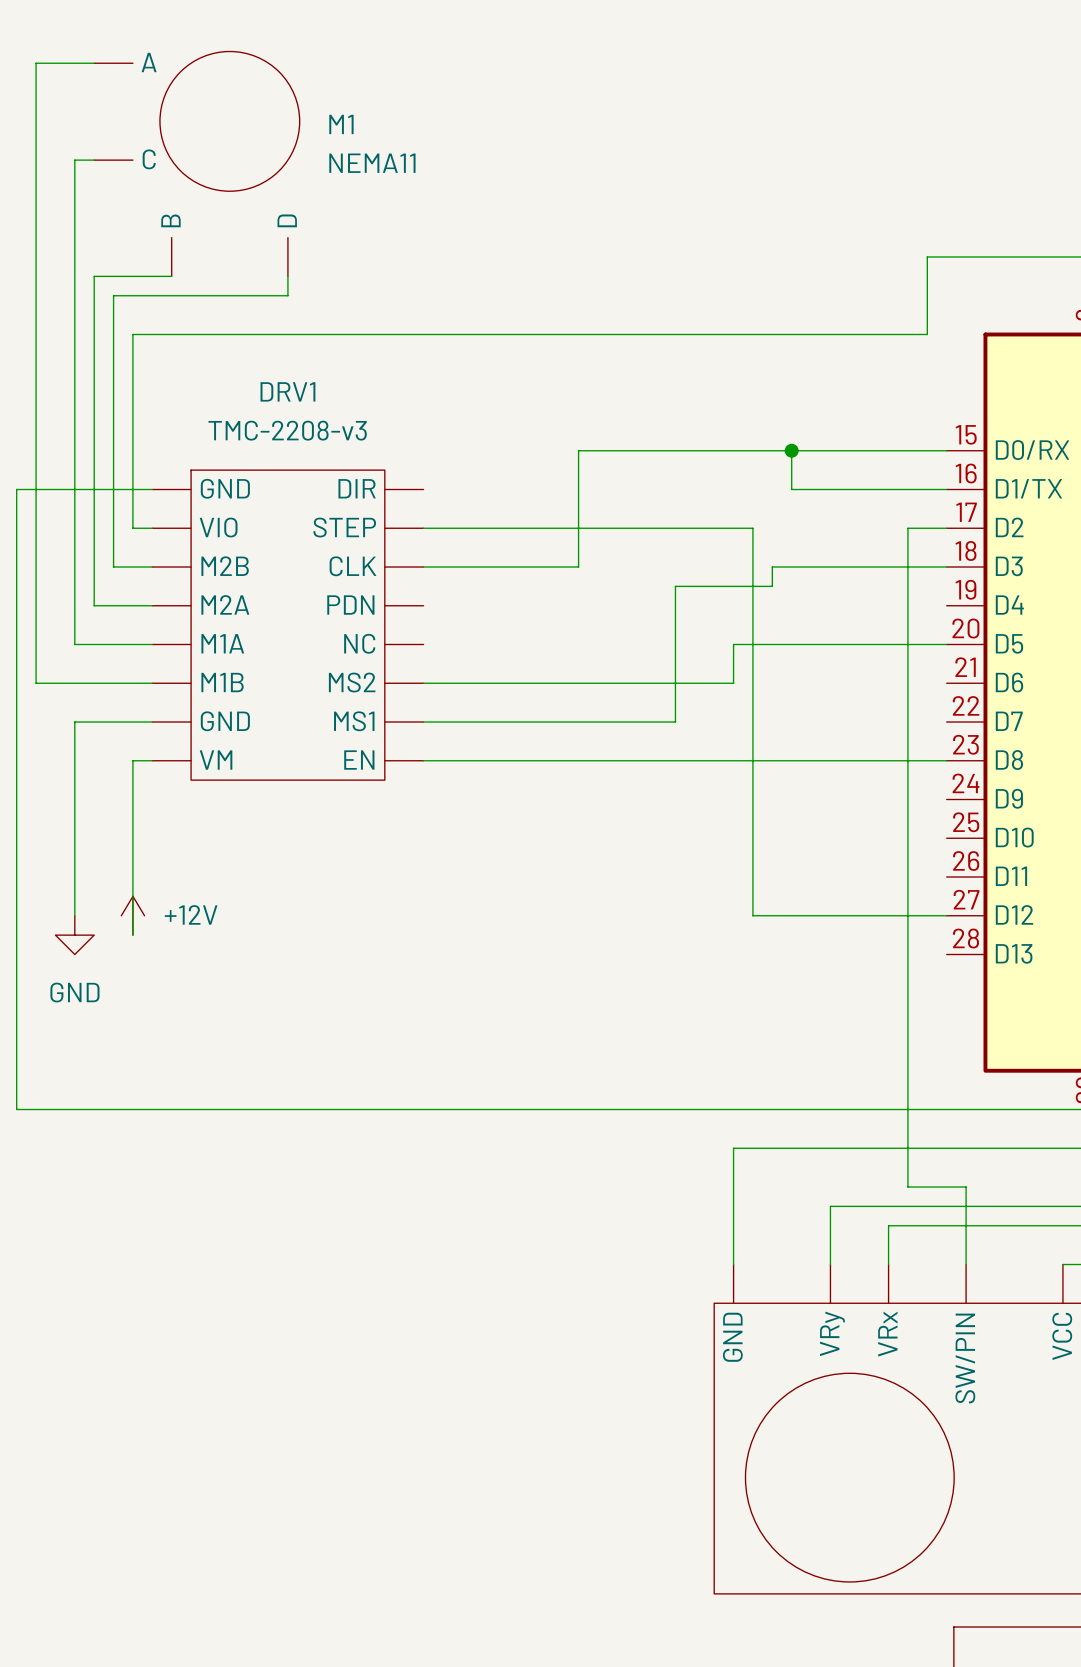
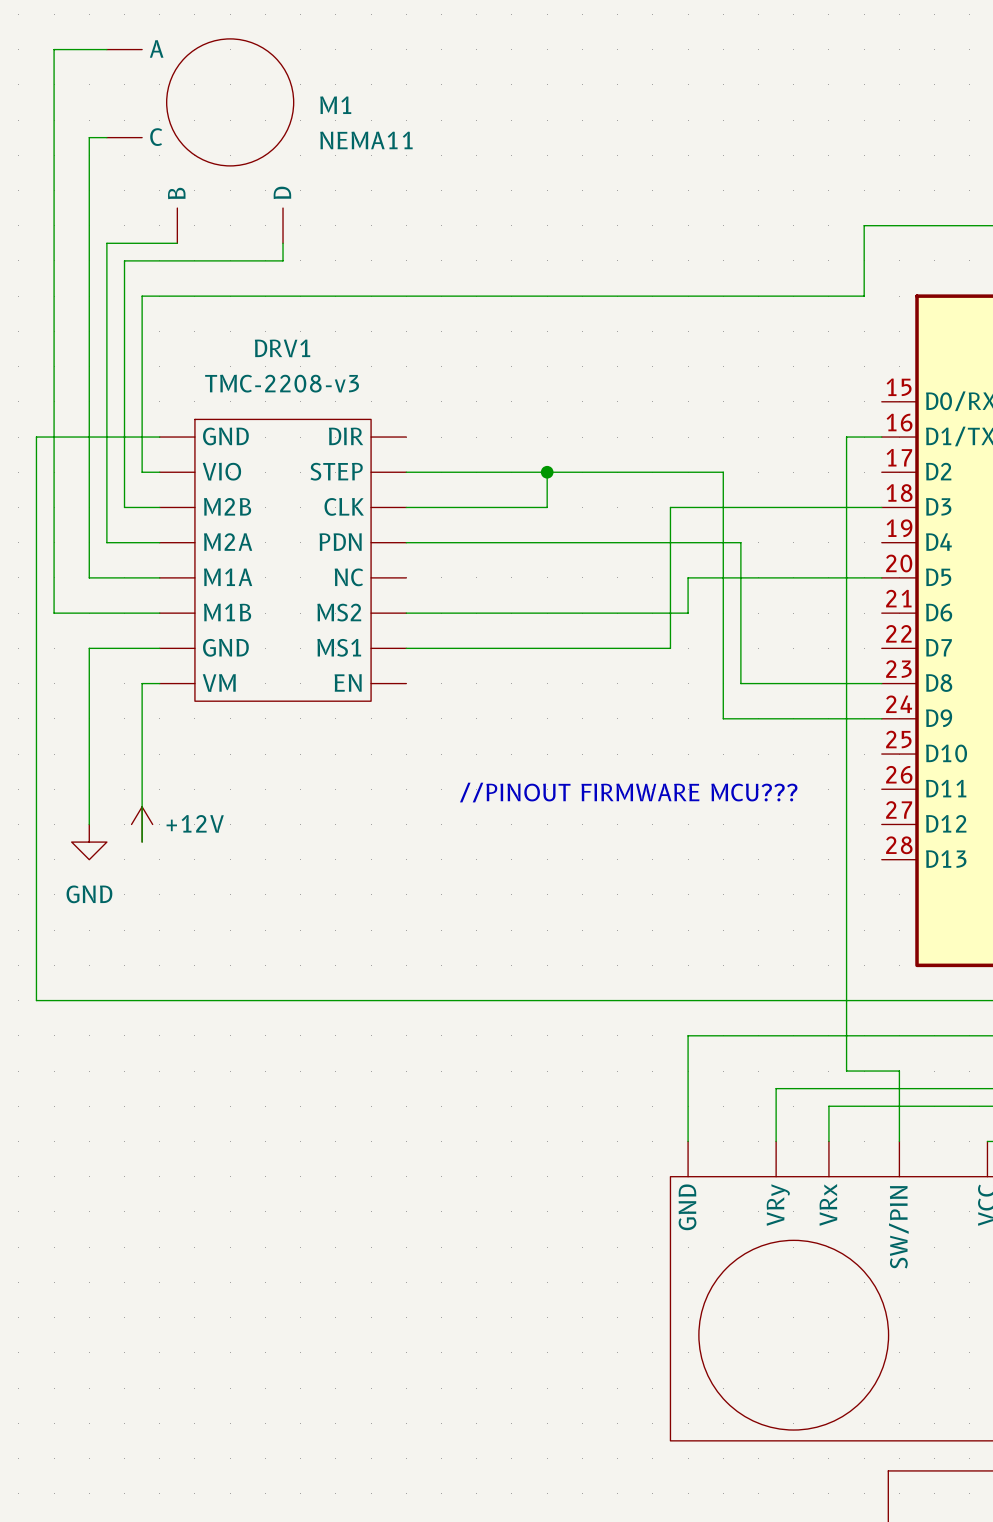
wire: (791, 450) (791, 489) (907, 489) -> none
junction: (791, 450) -> none
wire: (946, 450) (578, 450) (578, 528) -> none
junction: none -> (547, 472)
wire: (752, 528) (752, 915) (946, 915) -> none
wire: (907, 528) (946, 528) -> (846, 472) (846, 437)
wire: (772, 586) (675, 586) (675, 722) -> (705, 472) (723, 472) (723, 507) (670, 507) (670, 648) (635, 648)
wire: none -> (723, 525) (723, 718) (881, 718)
wire: (423, 760) (791, 760) -> (406, 542) (740, 542) (740, 683)
text: none -> //PINOUT FIRMWARE MCU??? (628, 792)

